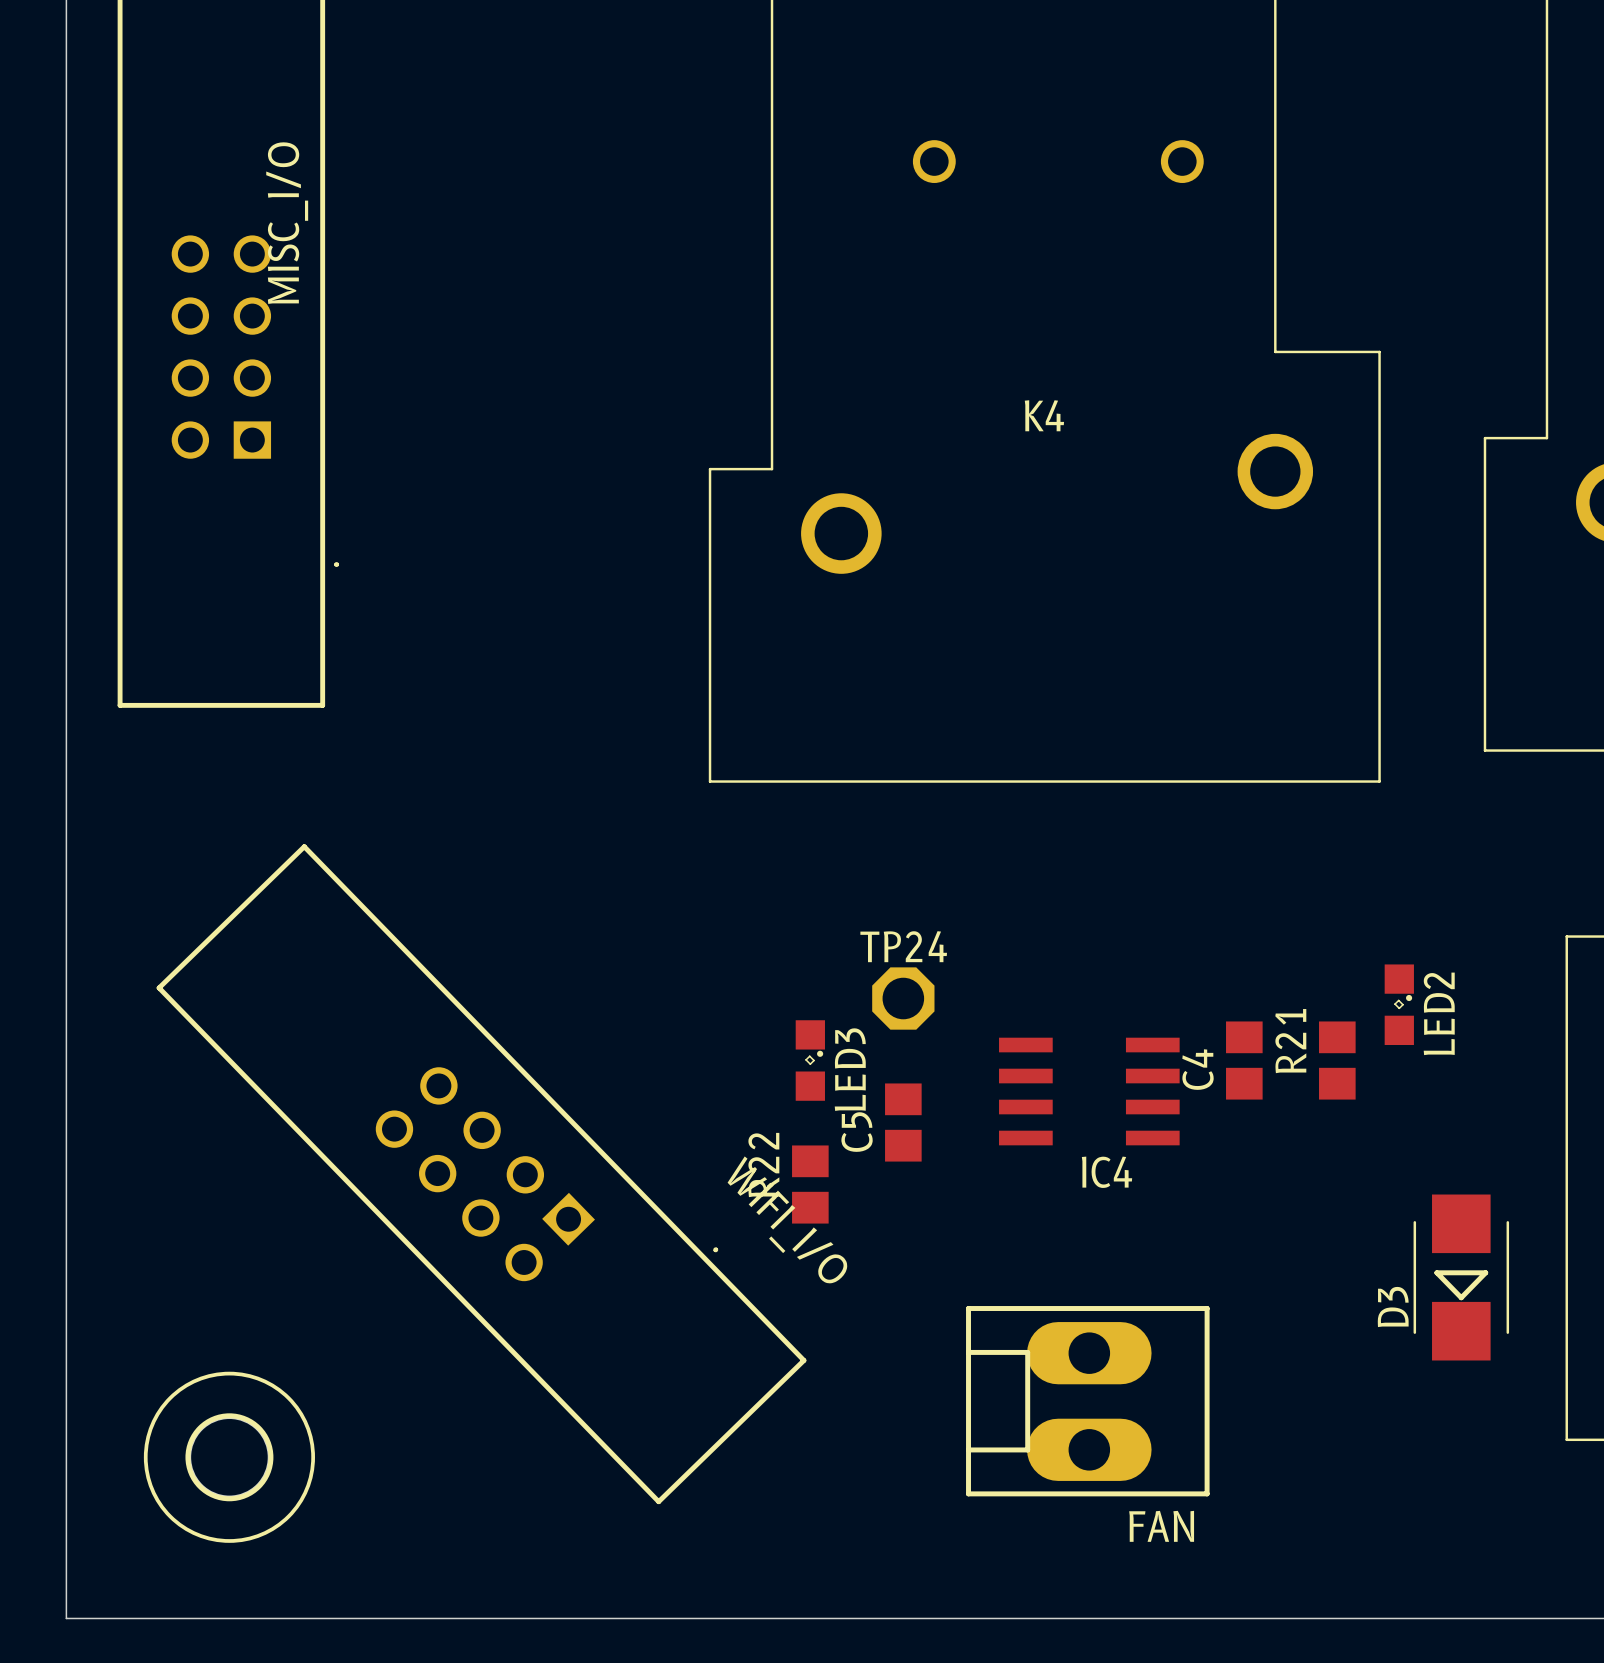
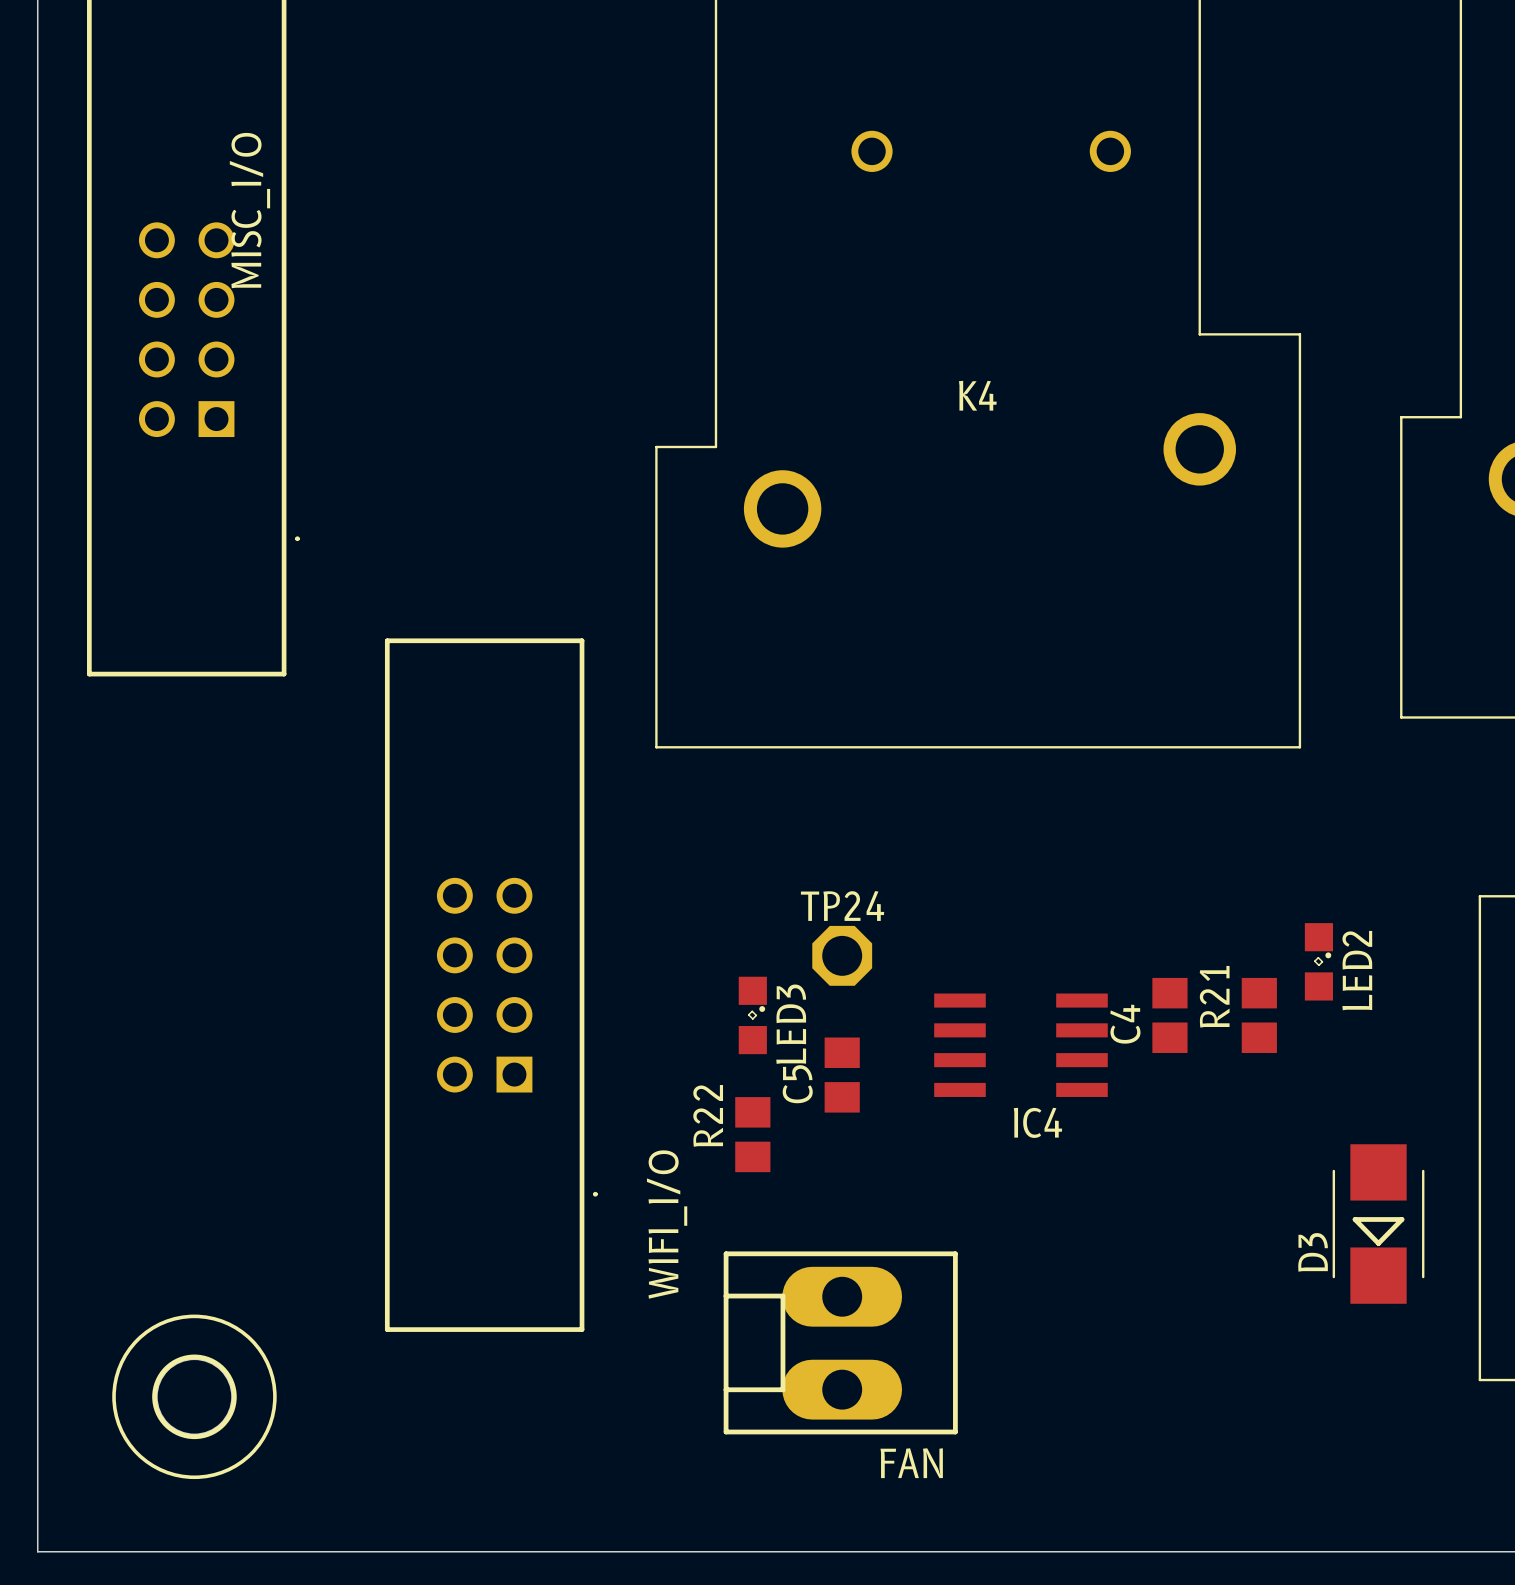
WIFI_I/O: none -> (491, 985)
WIFI_I/O: (481, 1174) -> none
FAN position: (1087, 1401) -> (840, 1342)

